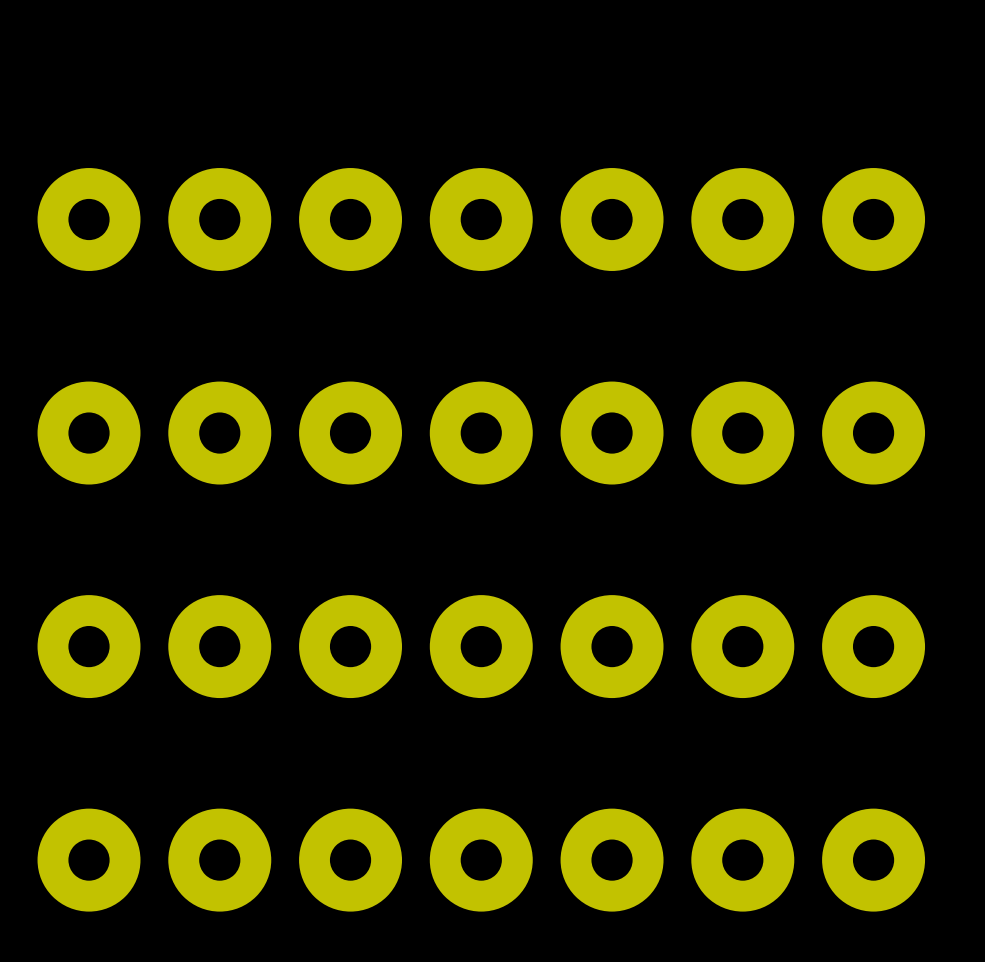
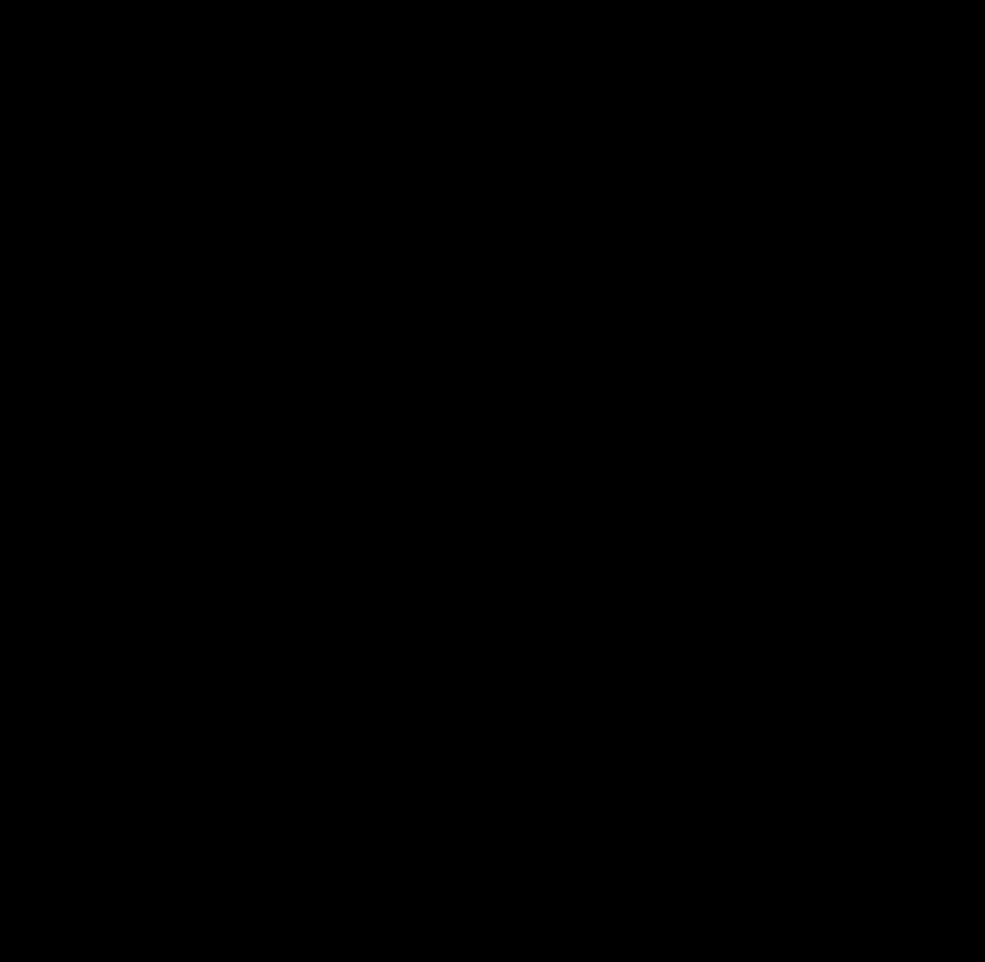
part: (481, 219) -> none
part: (481, 433) -> none
part: (481, 646) -> none
part: (481, 860) -> none

